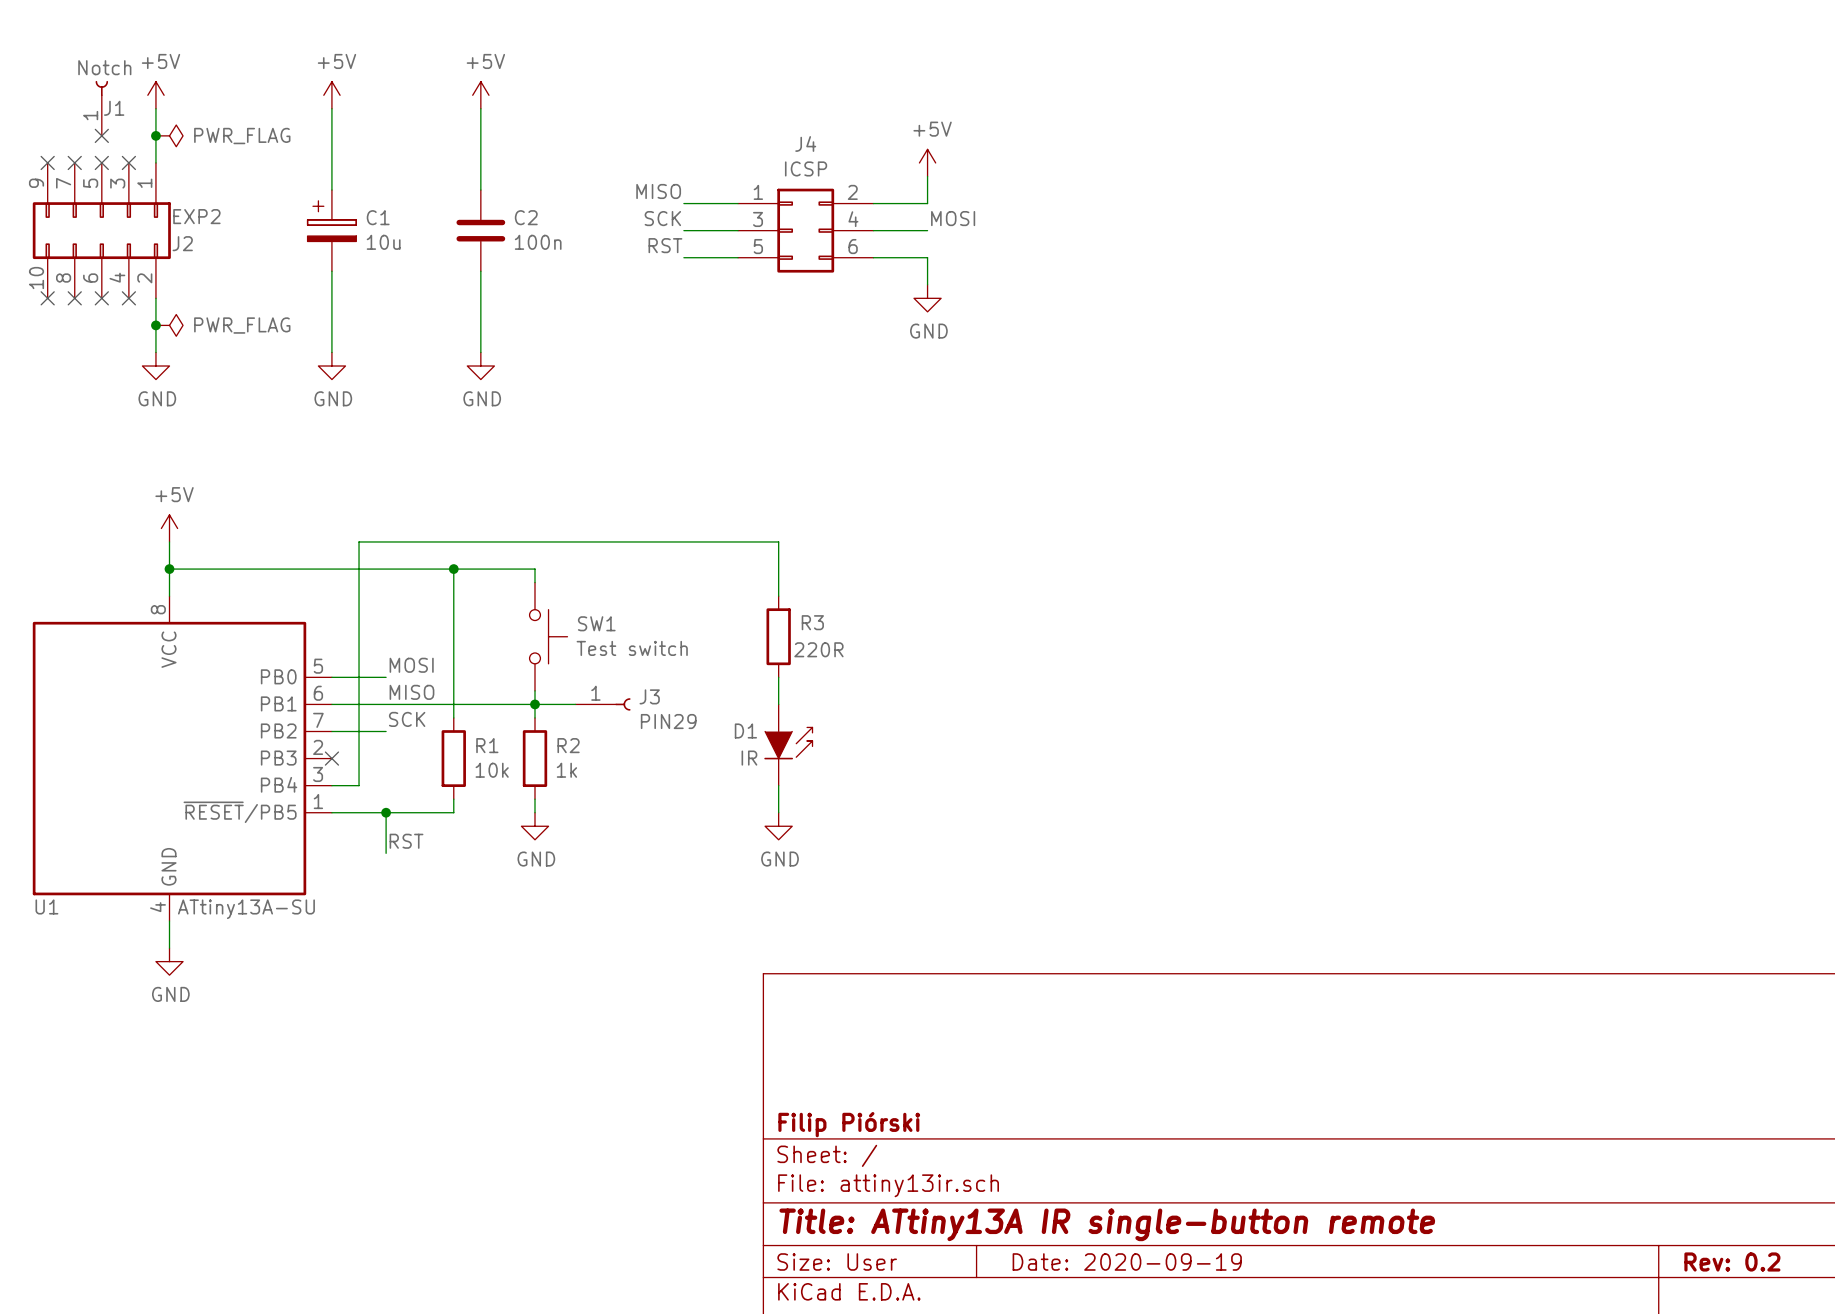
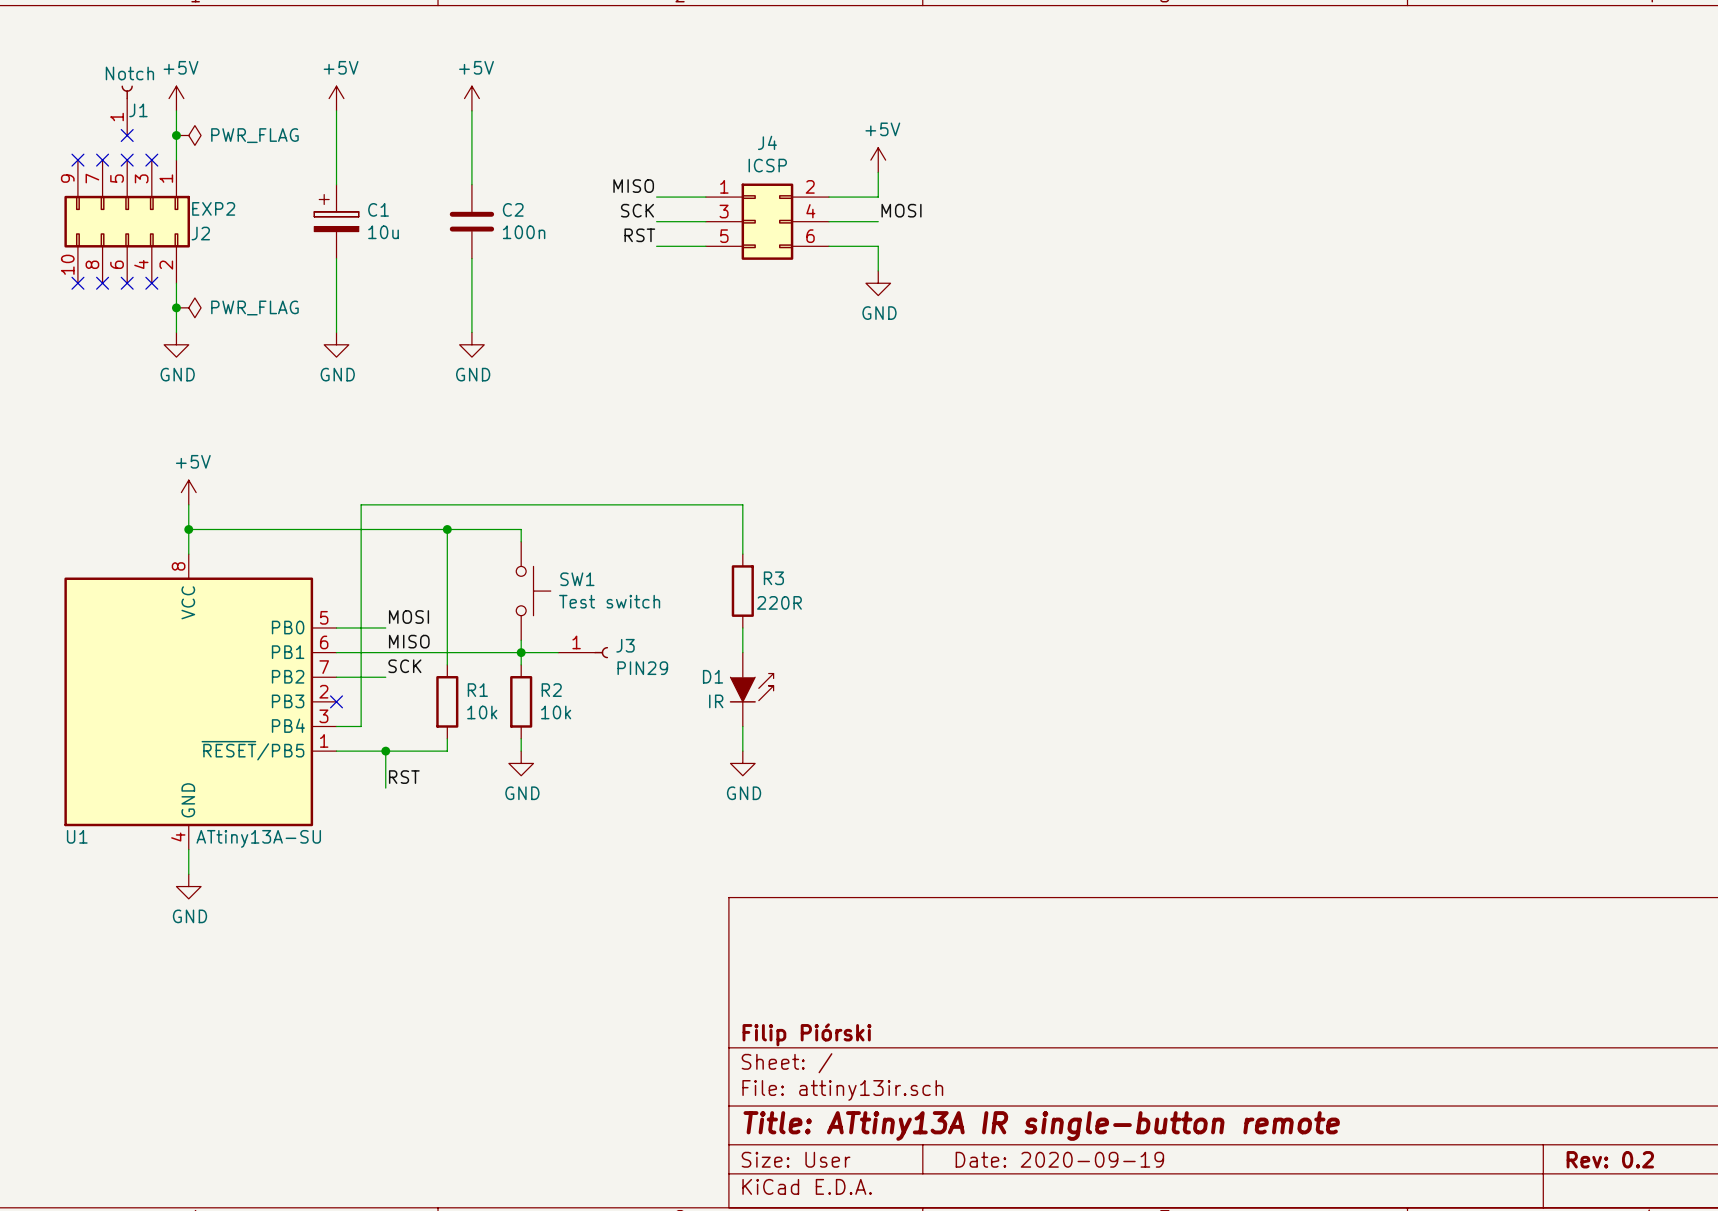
R2 value: 1k (566, 770) -> 10k (556, 712)

